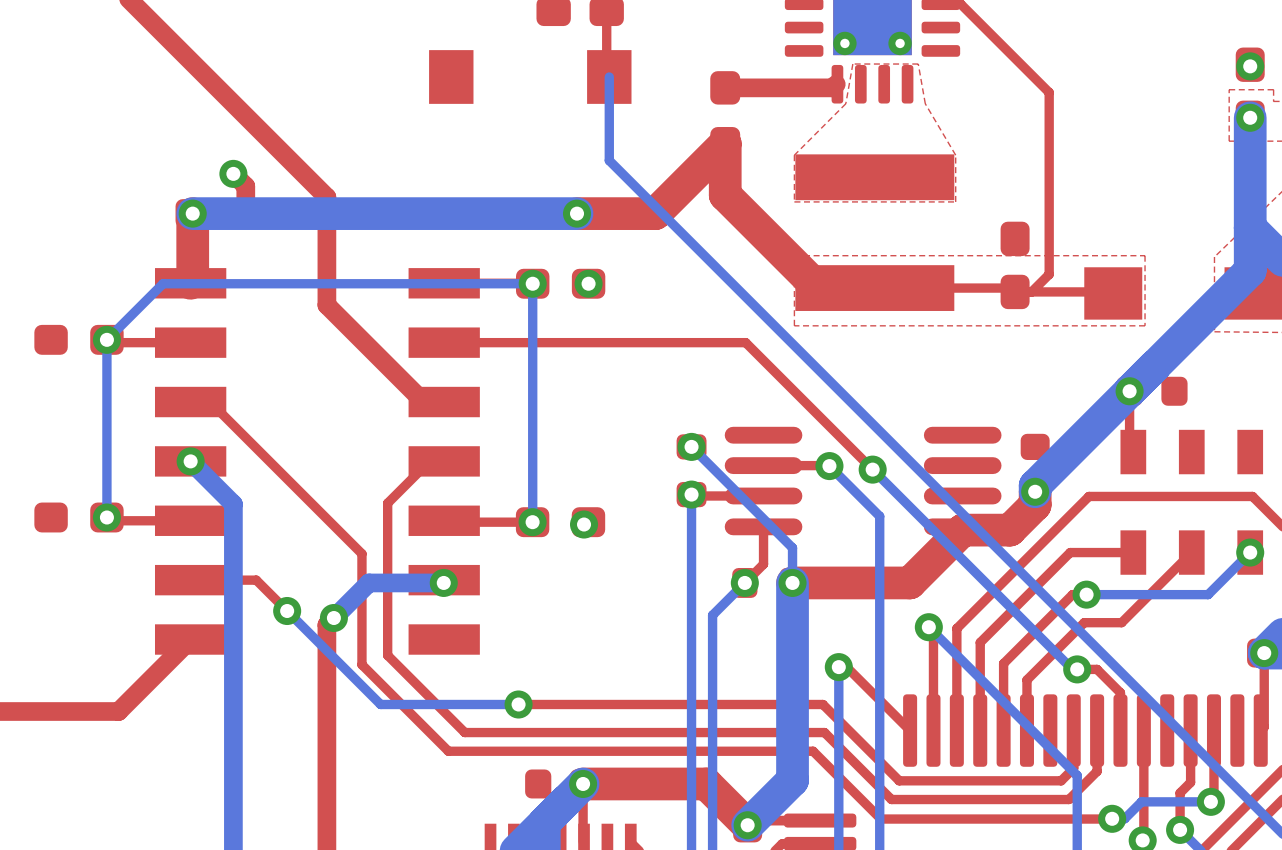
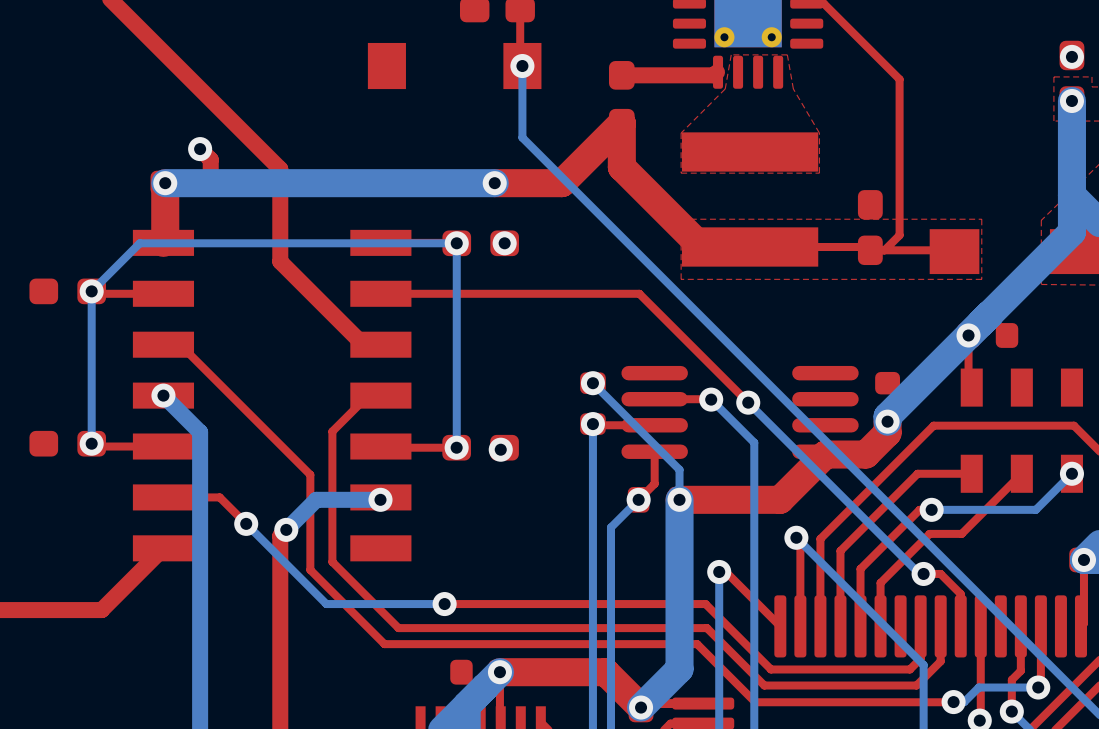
via: none -> (522, 66)

